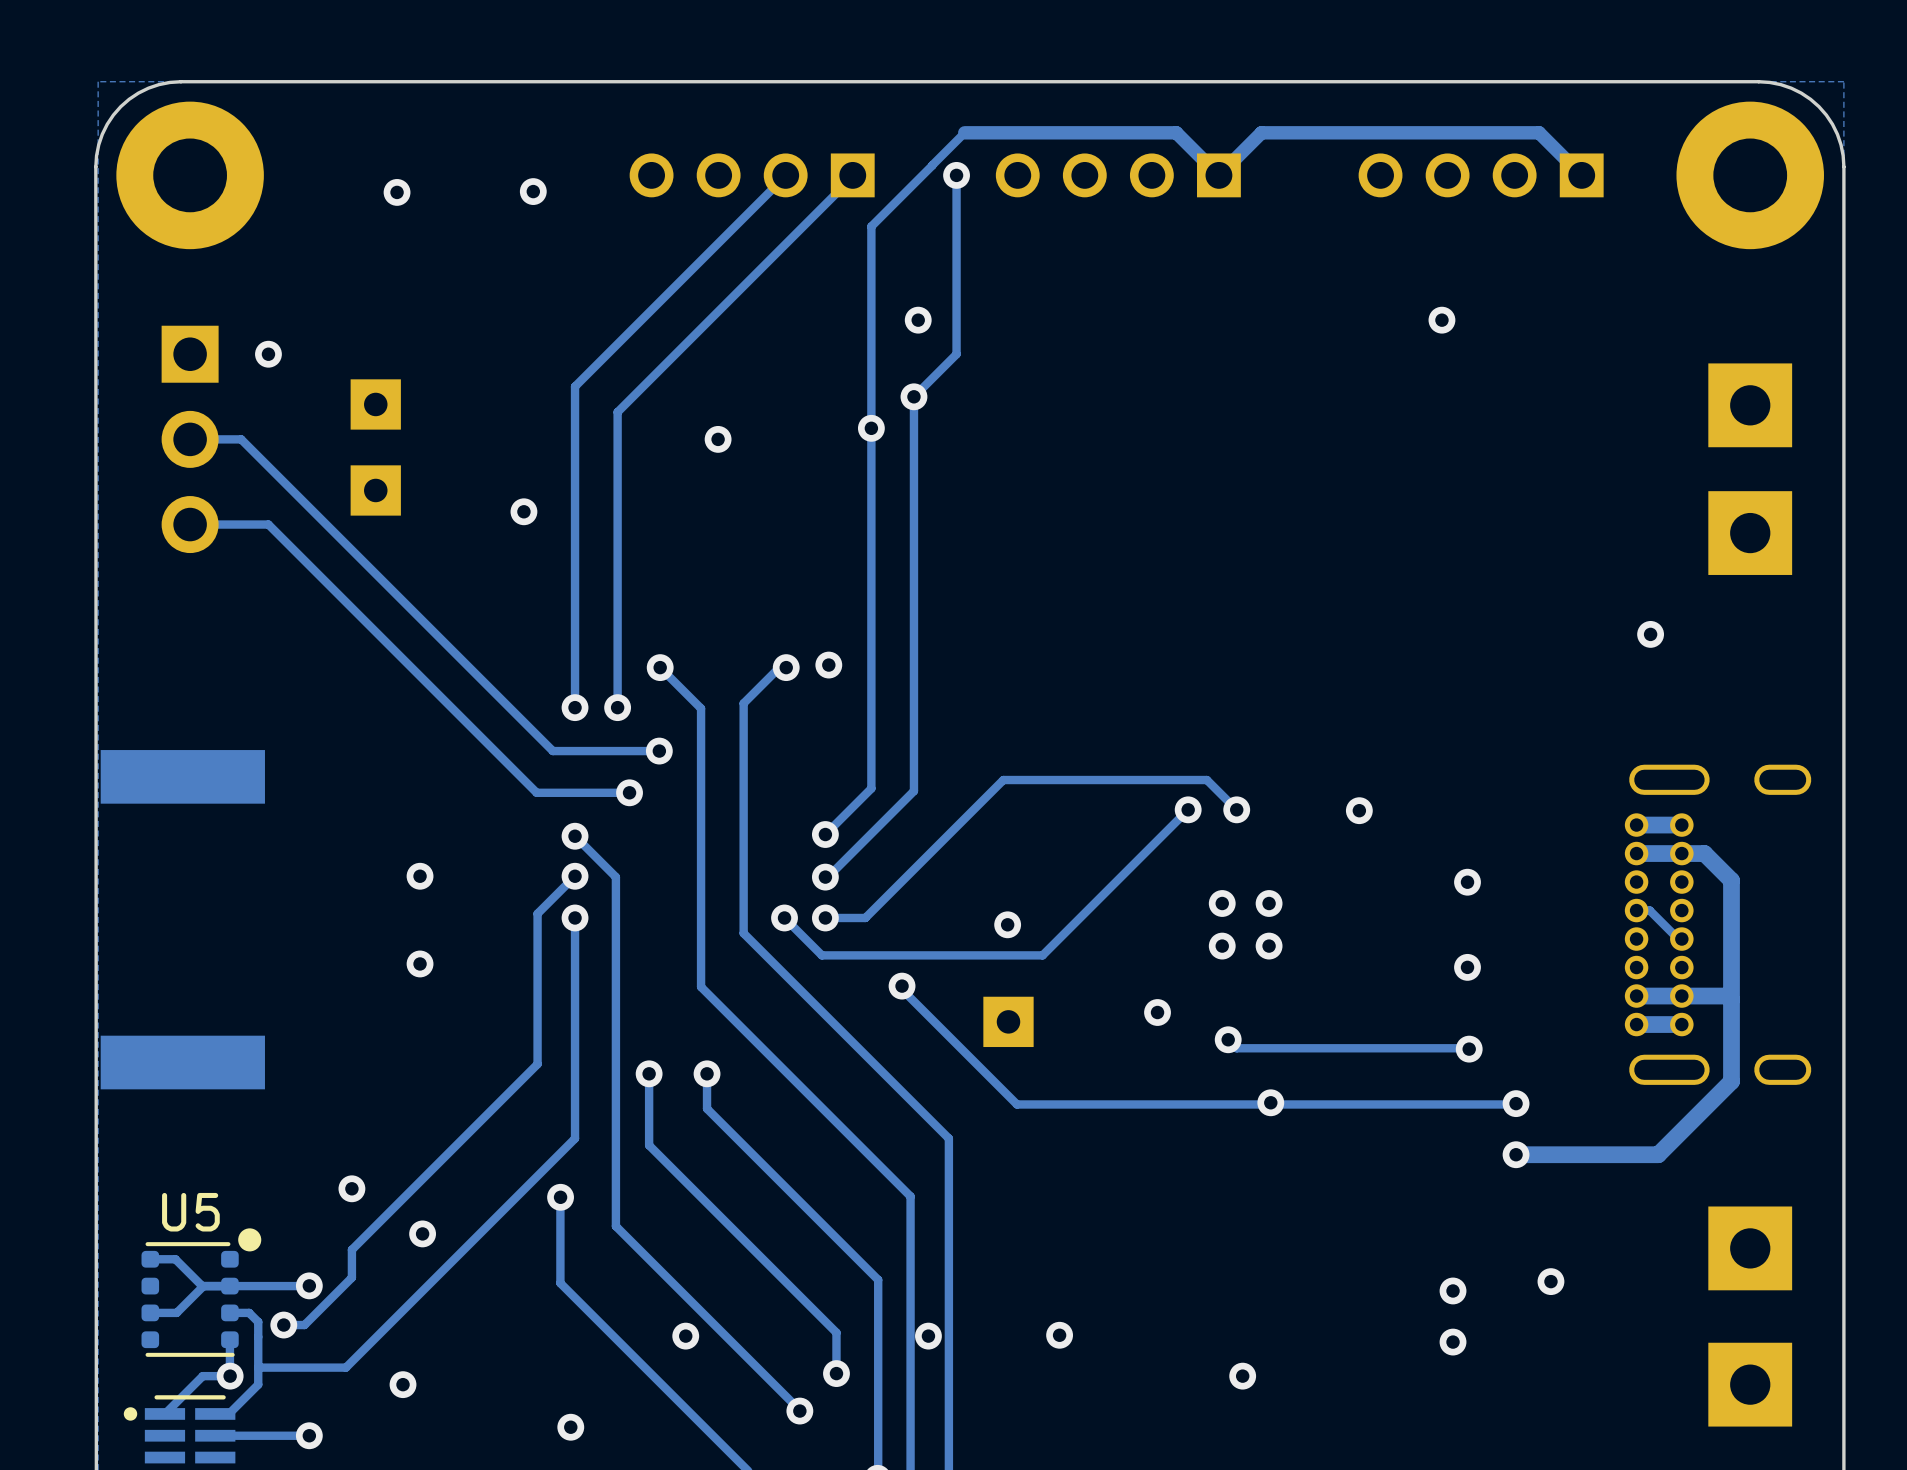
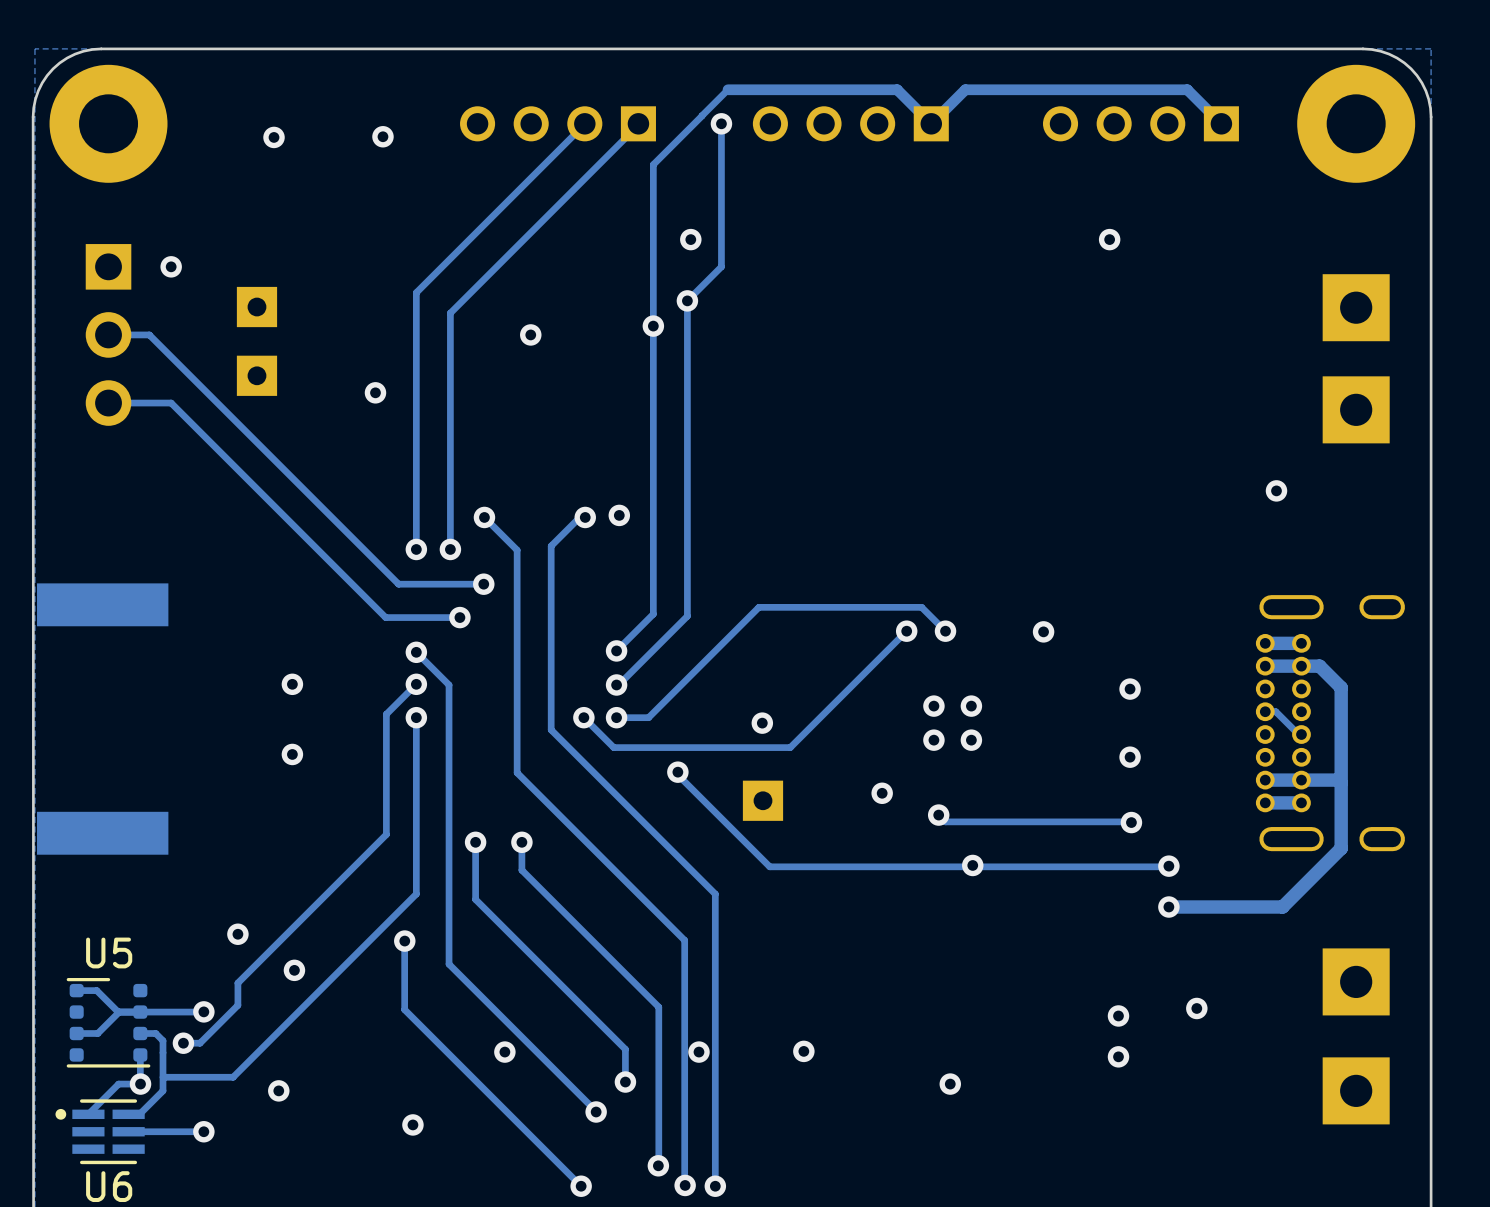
U5 footprint: [141, 1228, 262, 1357] -> [66, 978, 151, 1068]

